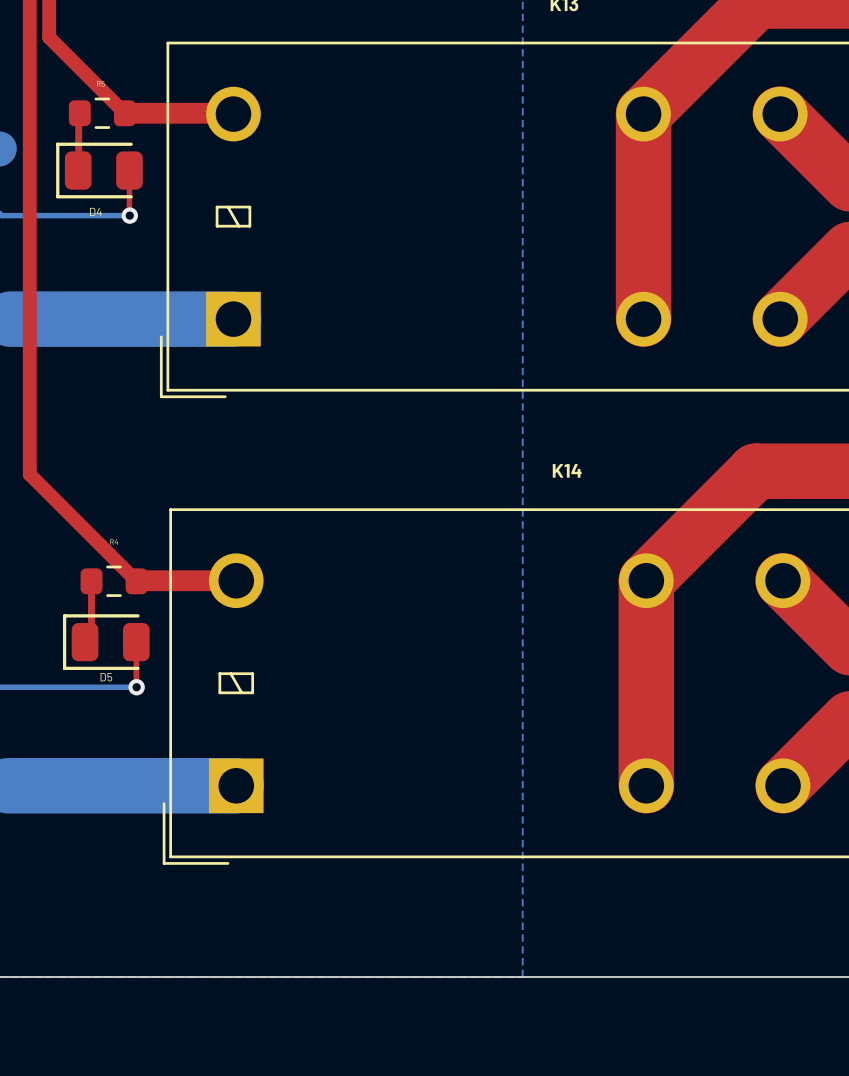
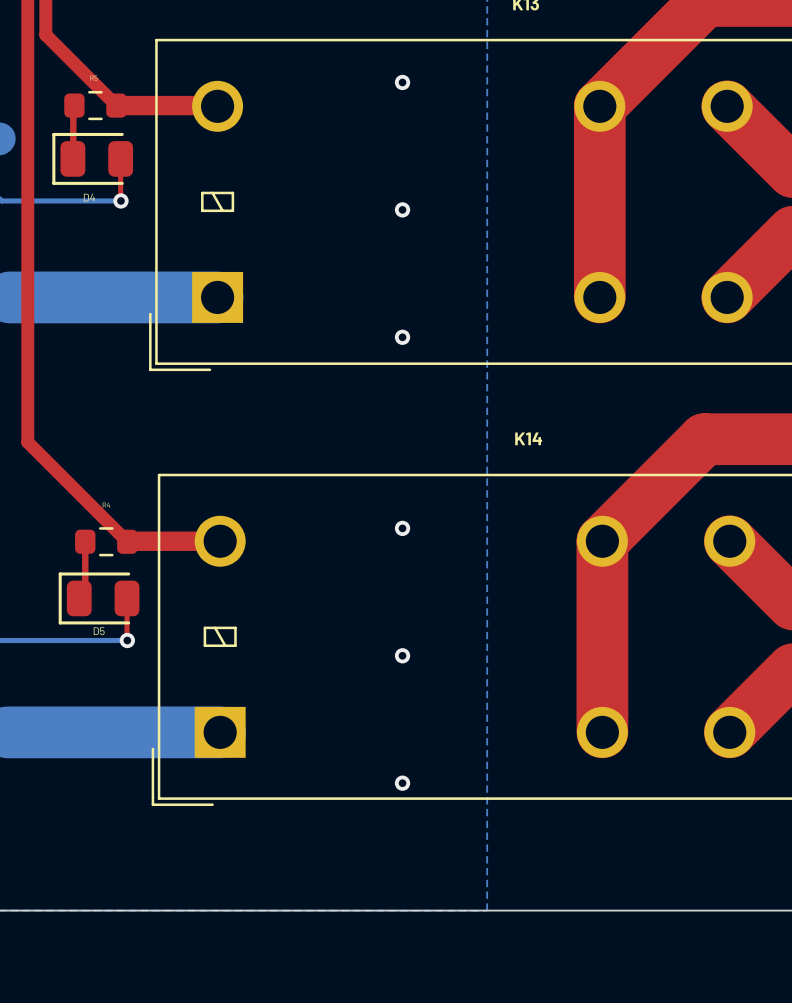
via: none -> (402, 82)
via: none -> (402, 209)
via: none -> (402, 337)
via: none -> (402, 528)
via: none -> (402, 655)
via: none -> (402, 783)

